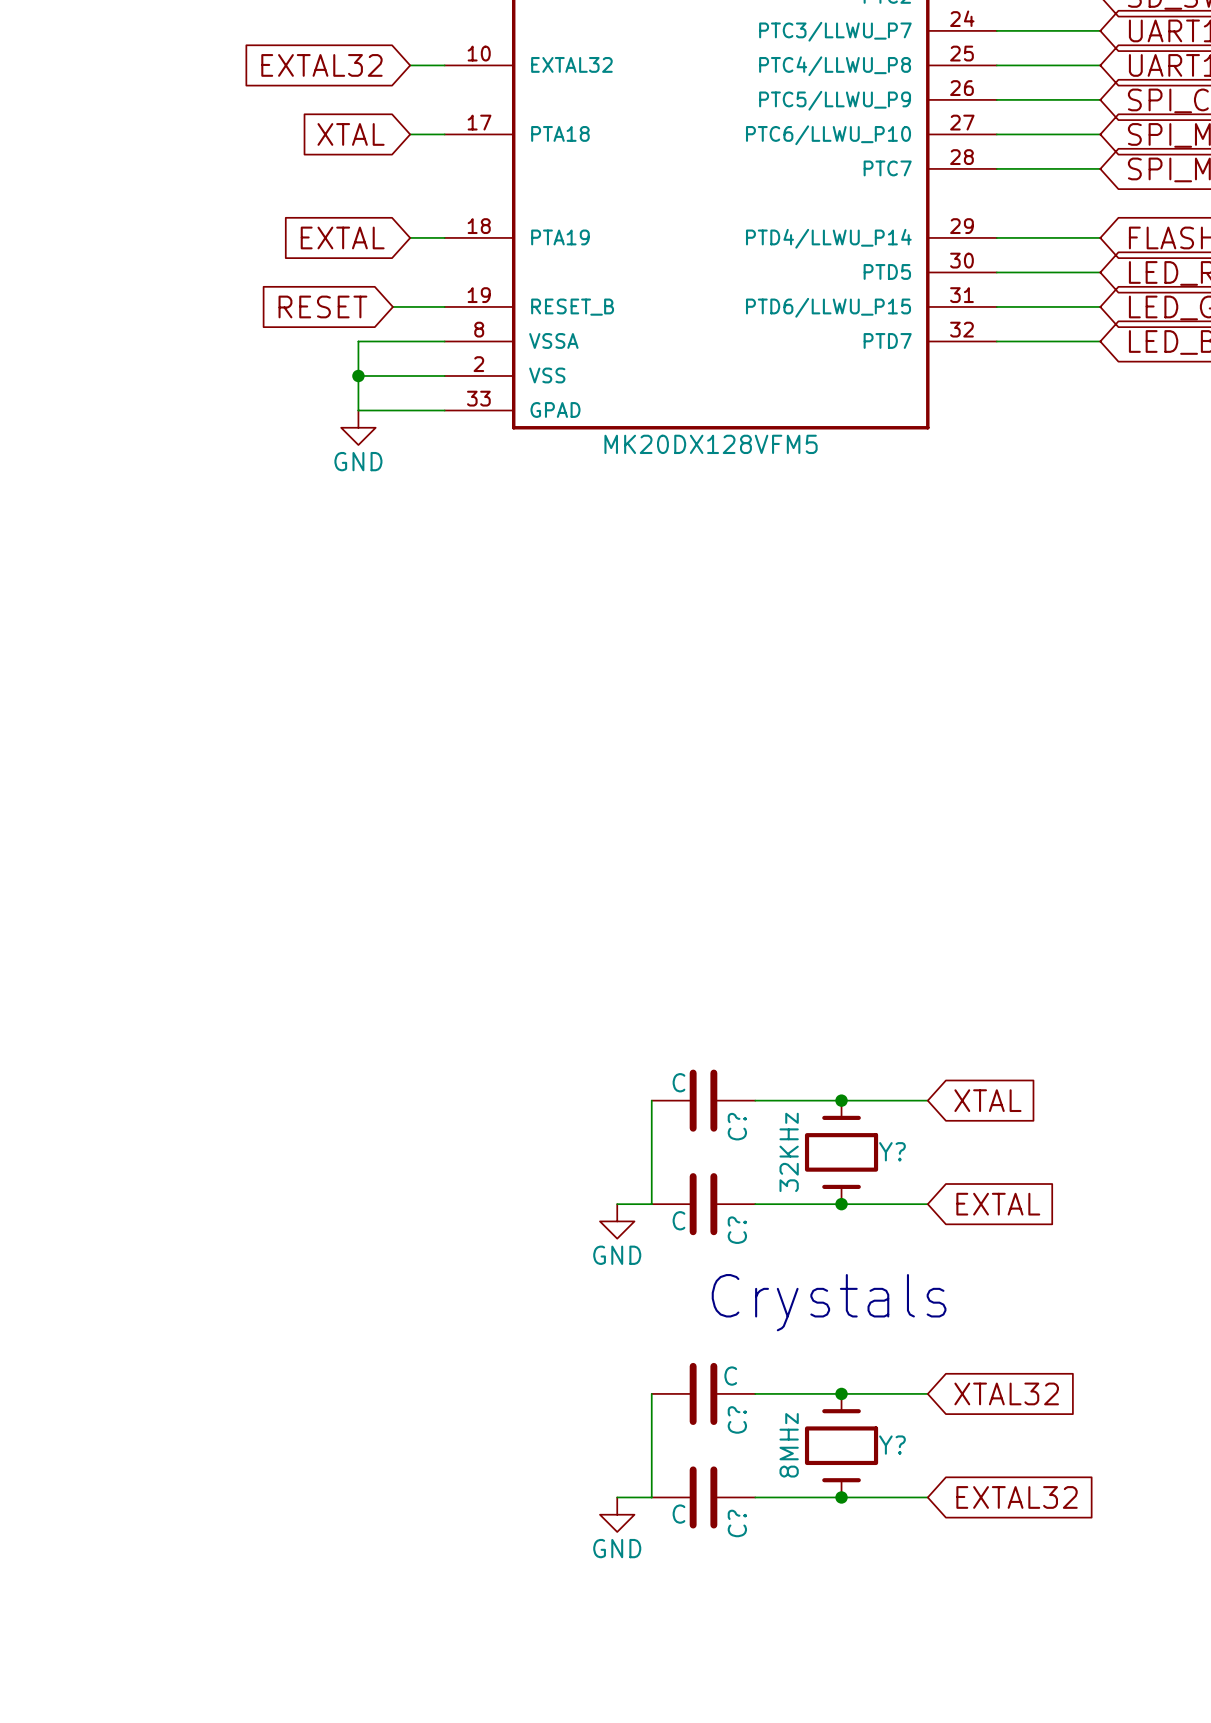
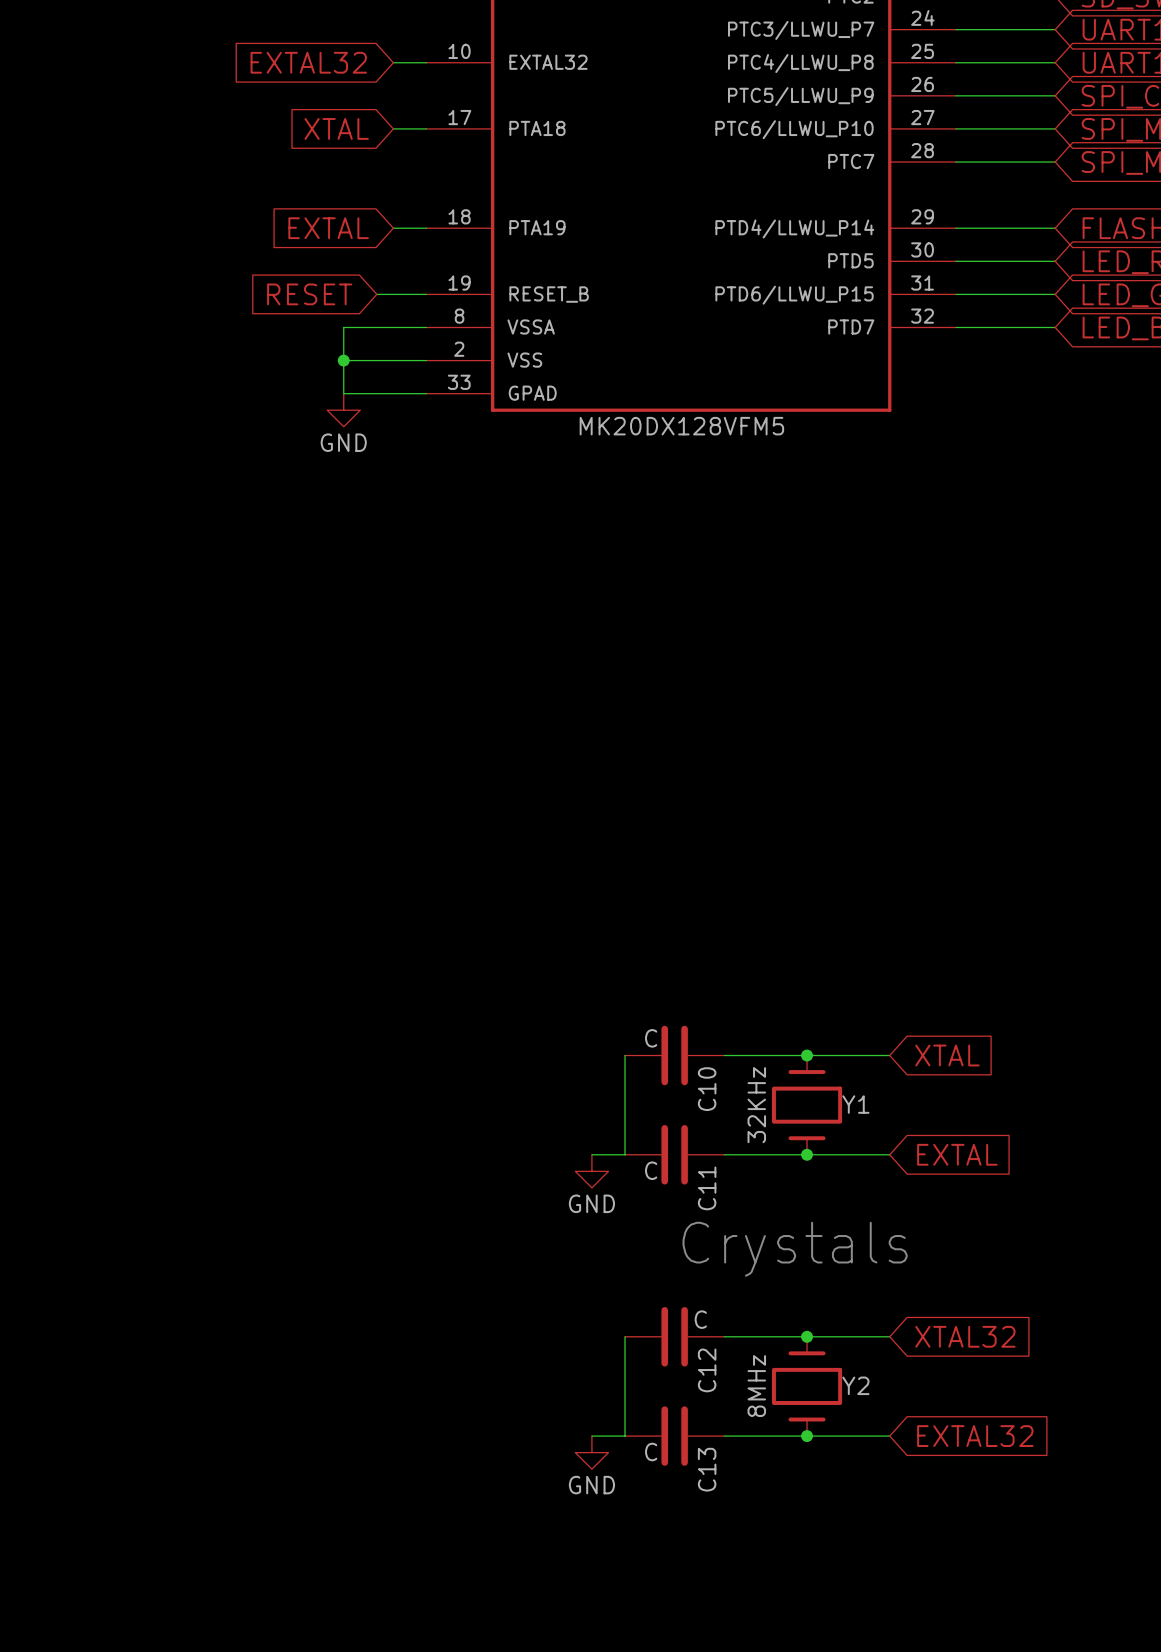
C? name: C? (737, 1126) -> C10 (707, 1089)
Y? name: Y? (892, 1151) -> Y1 (855, 1104)
C? name: C? (737, 1230) -> C11 (707, 1188)
C? name: C? (737, 1419) -> C12 (707, 1370)
Y? name: Y? (892, 1445) -> Y2 (855, 1385)
C? name: C? (737, 1523) -> C13 (707, 1469)

